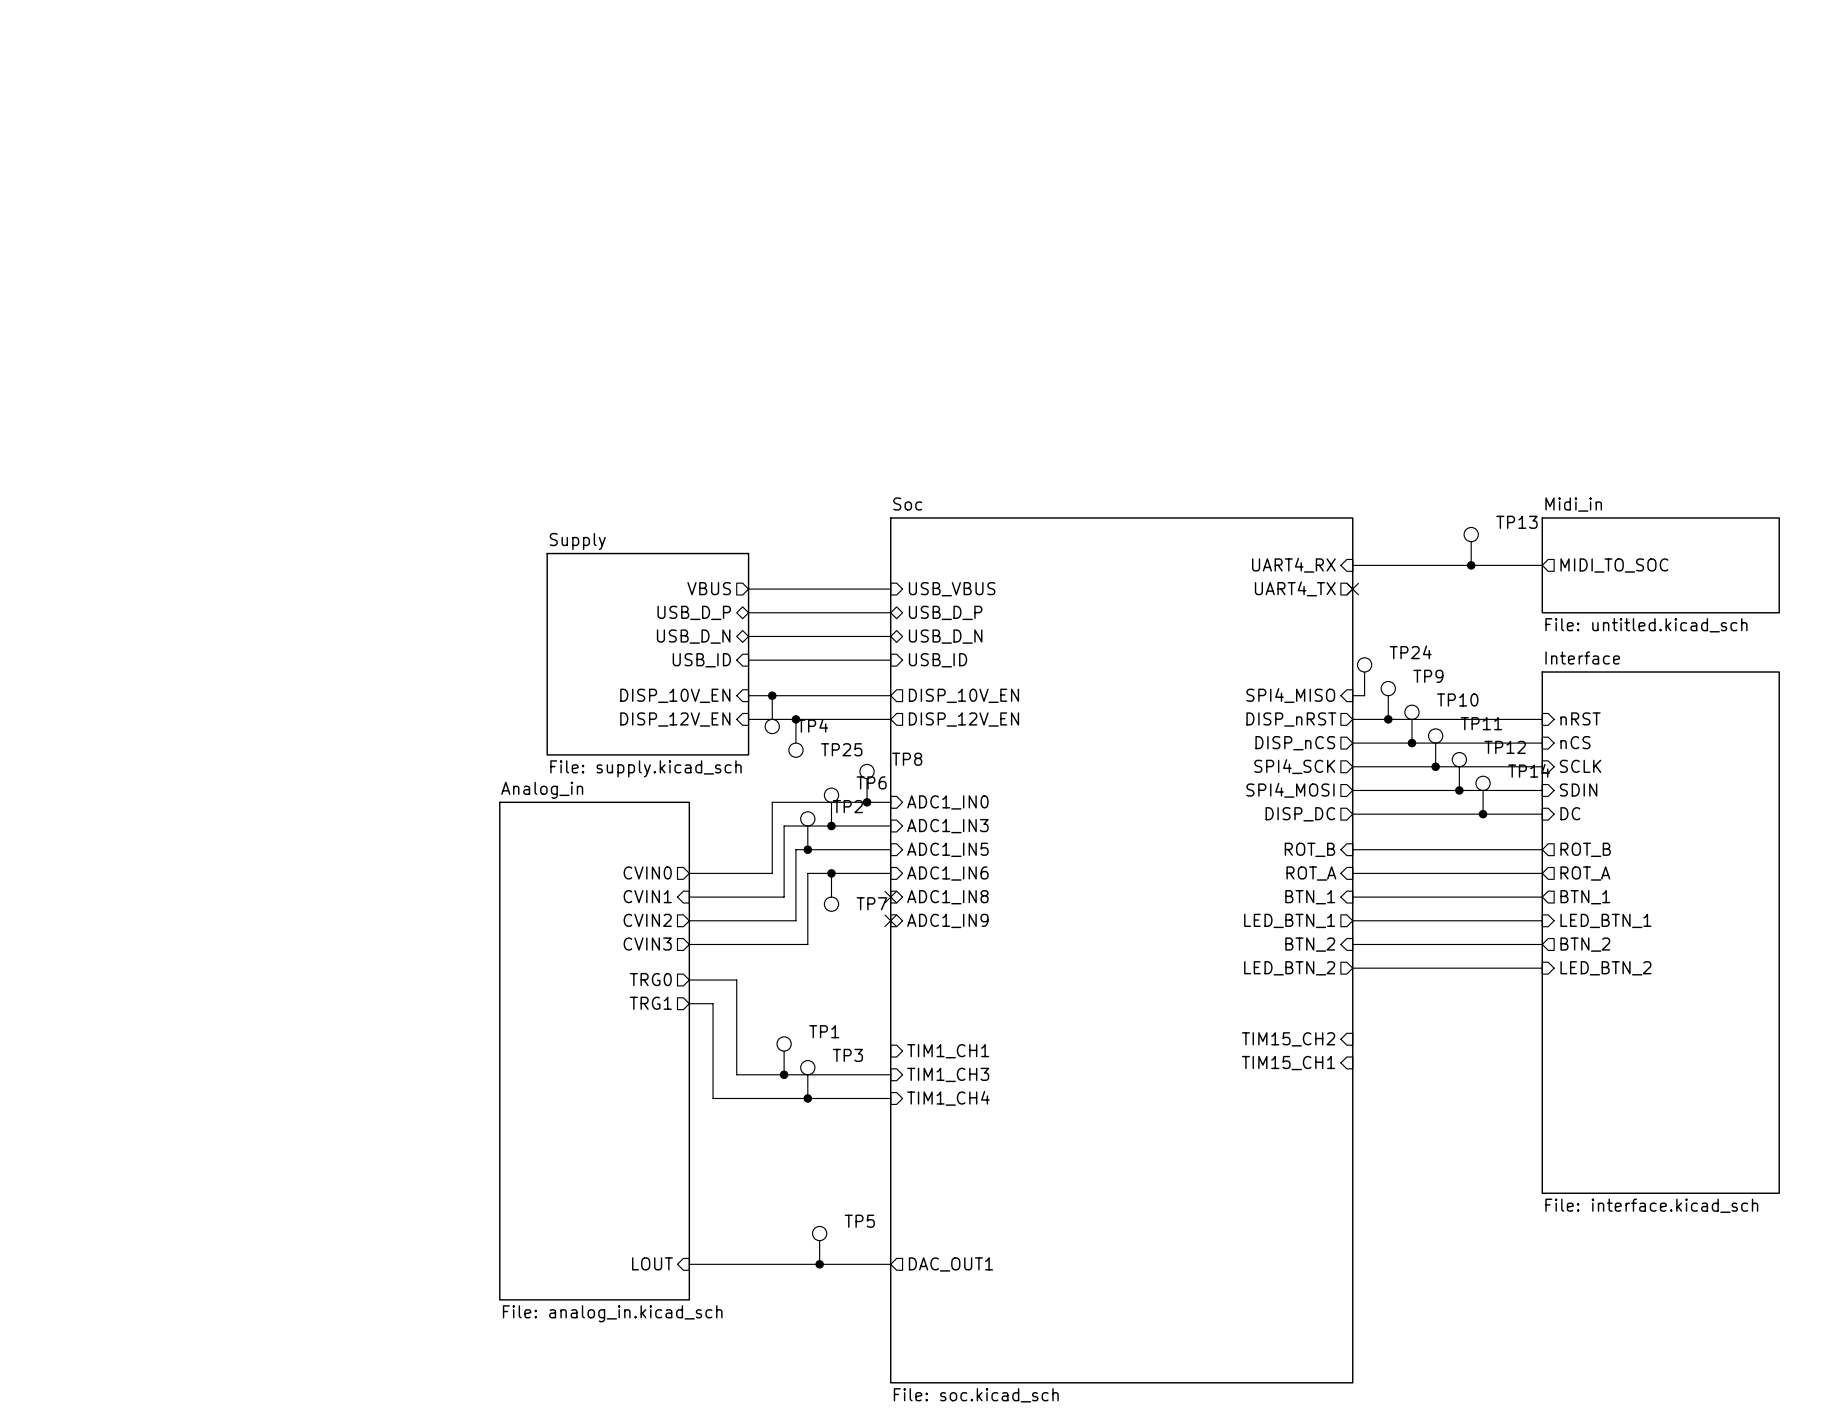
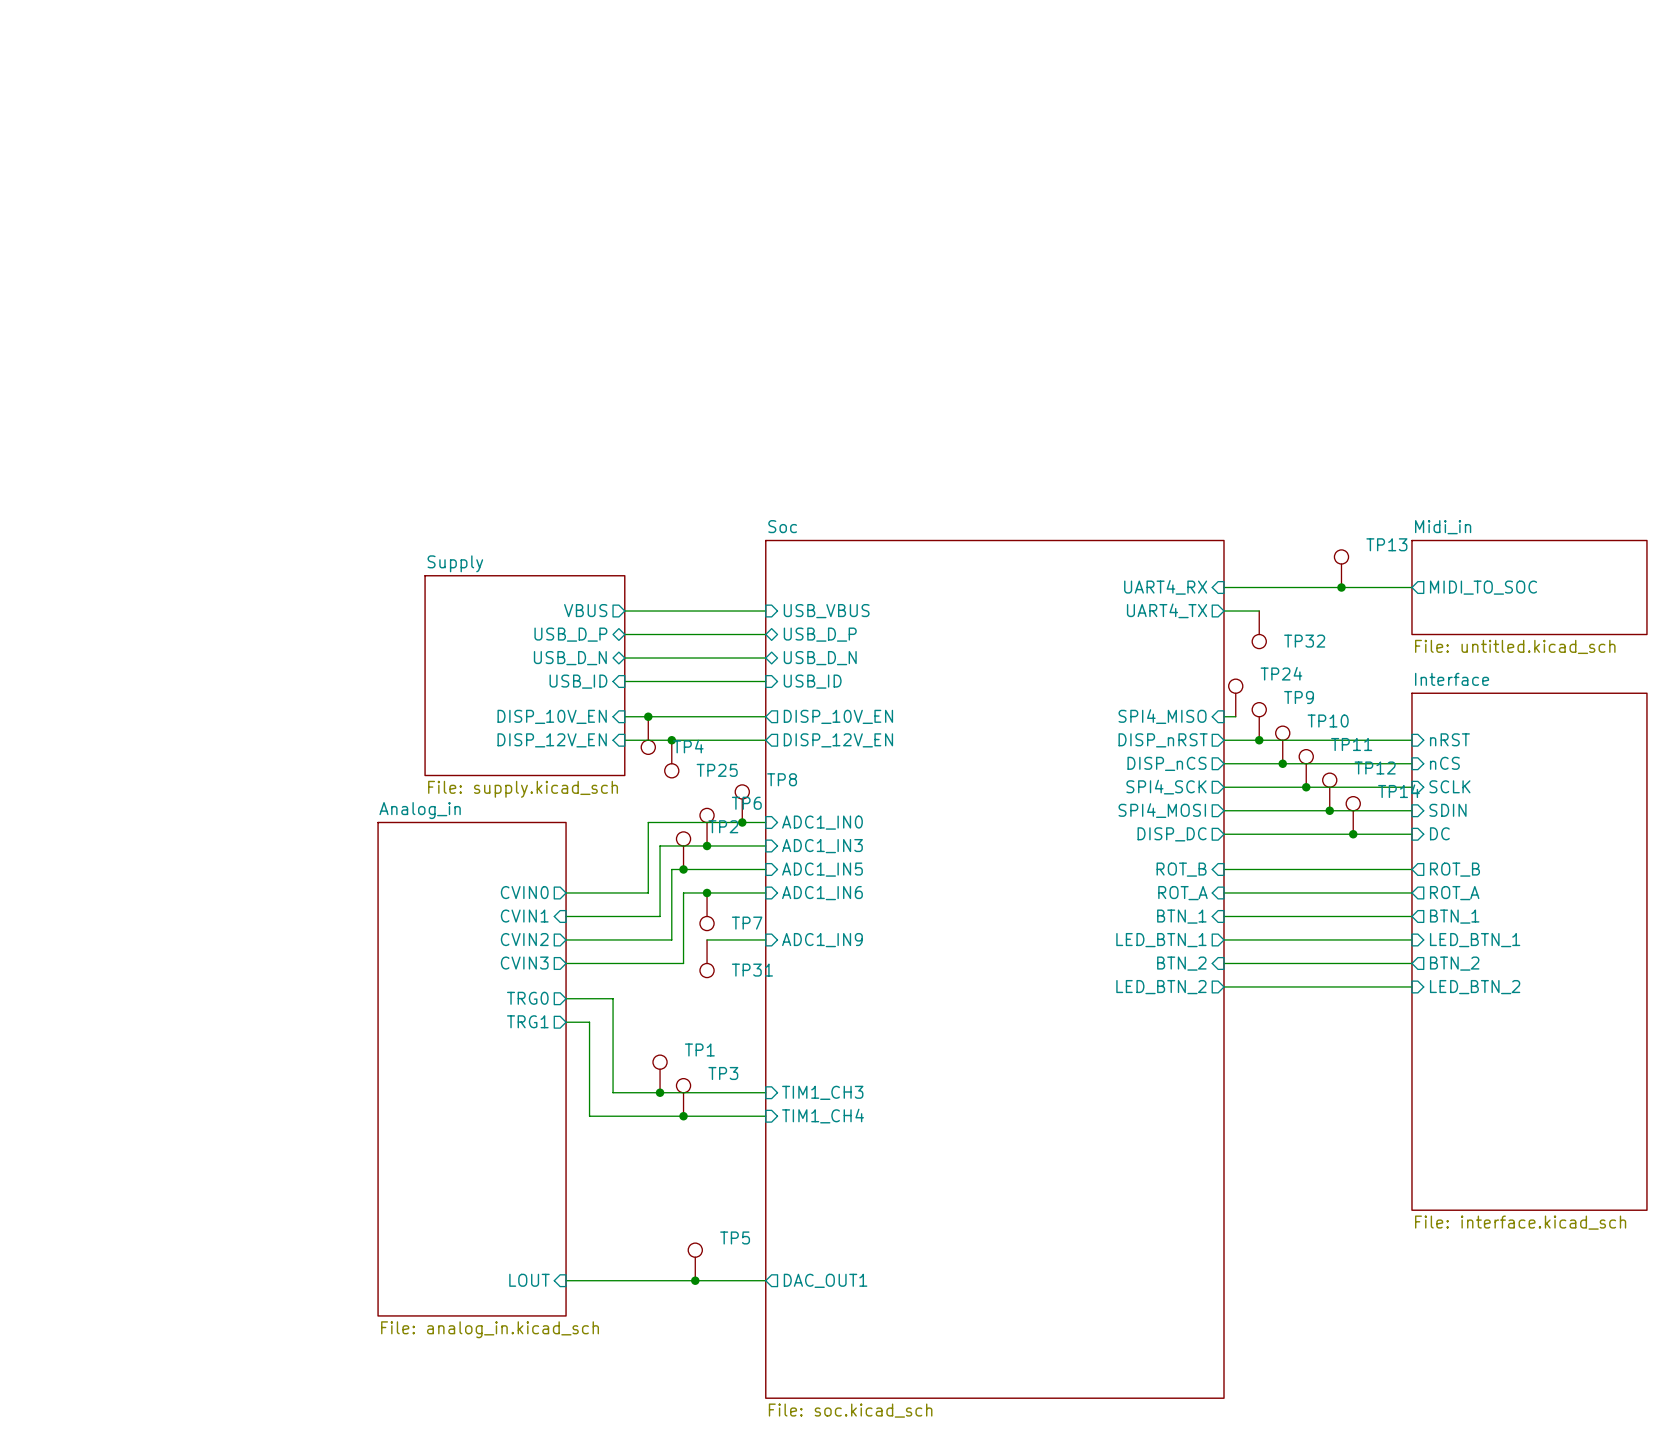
wire: none -> (1223, 611) (1259, 611)
no-connect mark: (1352, 589) -> none
TP32: none -> (1259, 629)
no-connect mark: (890, 897) -> none
sheet pin: ADC1_IN8 (947, 897) -> none
wire: none -> (707, 939) (765, 939)
no-connect mark: (890, 920) -> none
TP31: none -> (707, 958)
sheet pin: TIM15_CH2 (1288, 1039) -> none
sheet pin: TIM1_CH1 (948, 1051) -> none
sheet pin: TIM15_CH1 (1288, 1063) -> none

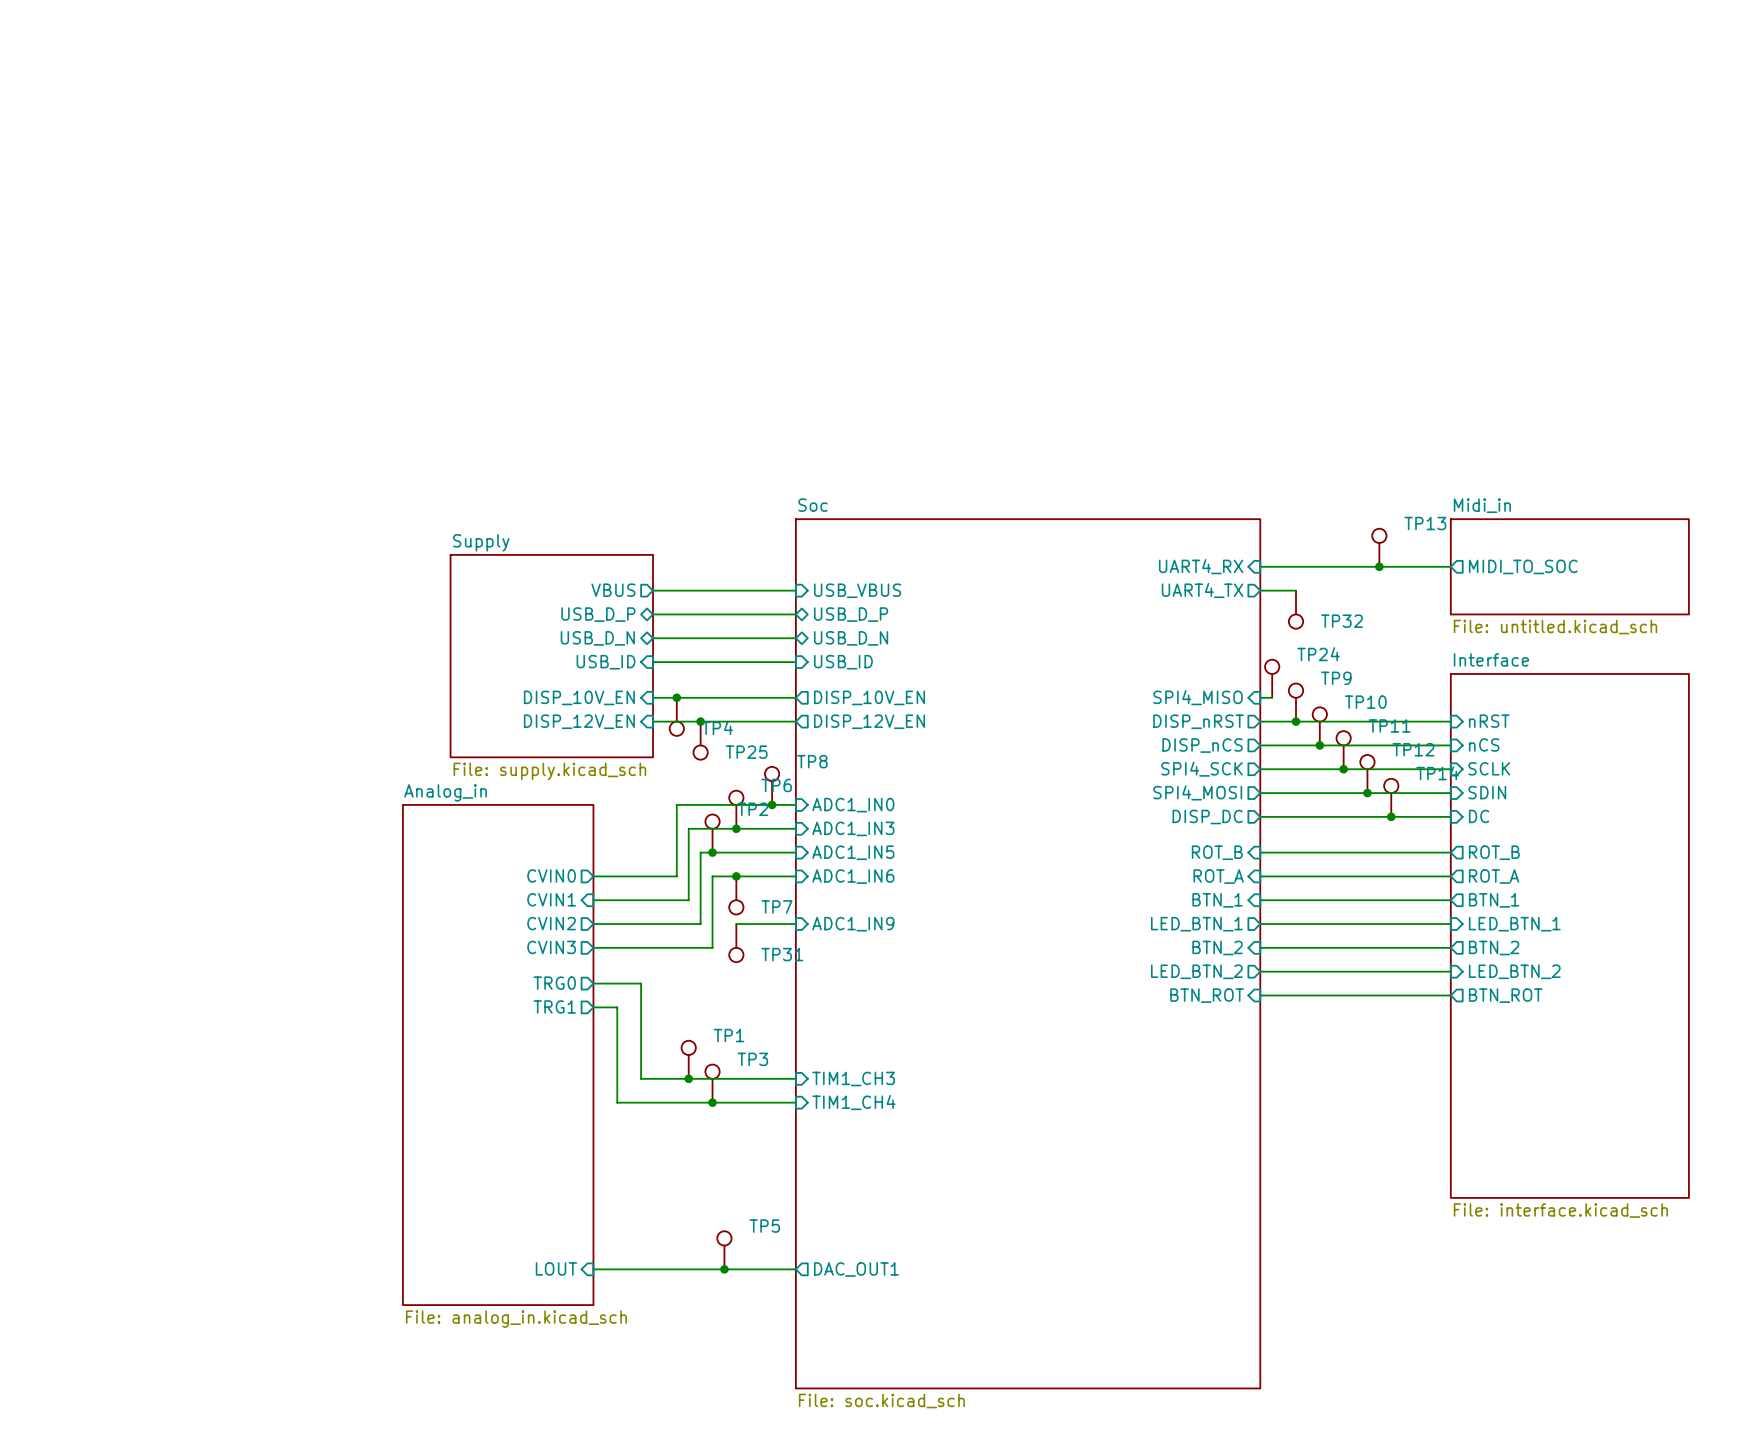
sheet pin: none -> BTN_ROT (1207, 995)
wire: none -> (1260, 995) (1450, 995)
sheet pin: none -> BTN_ROT (1505, 995)

